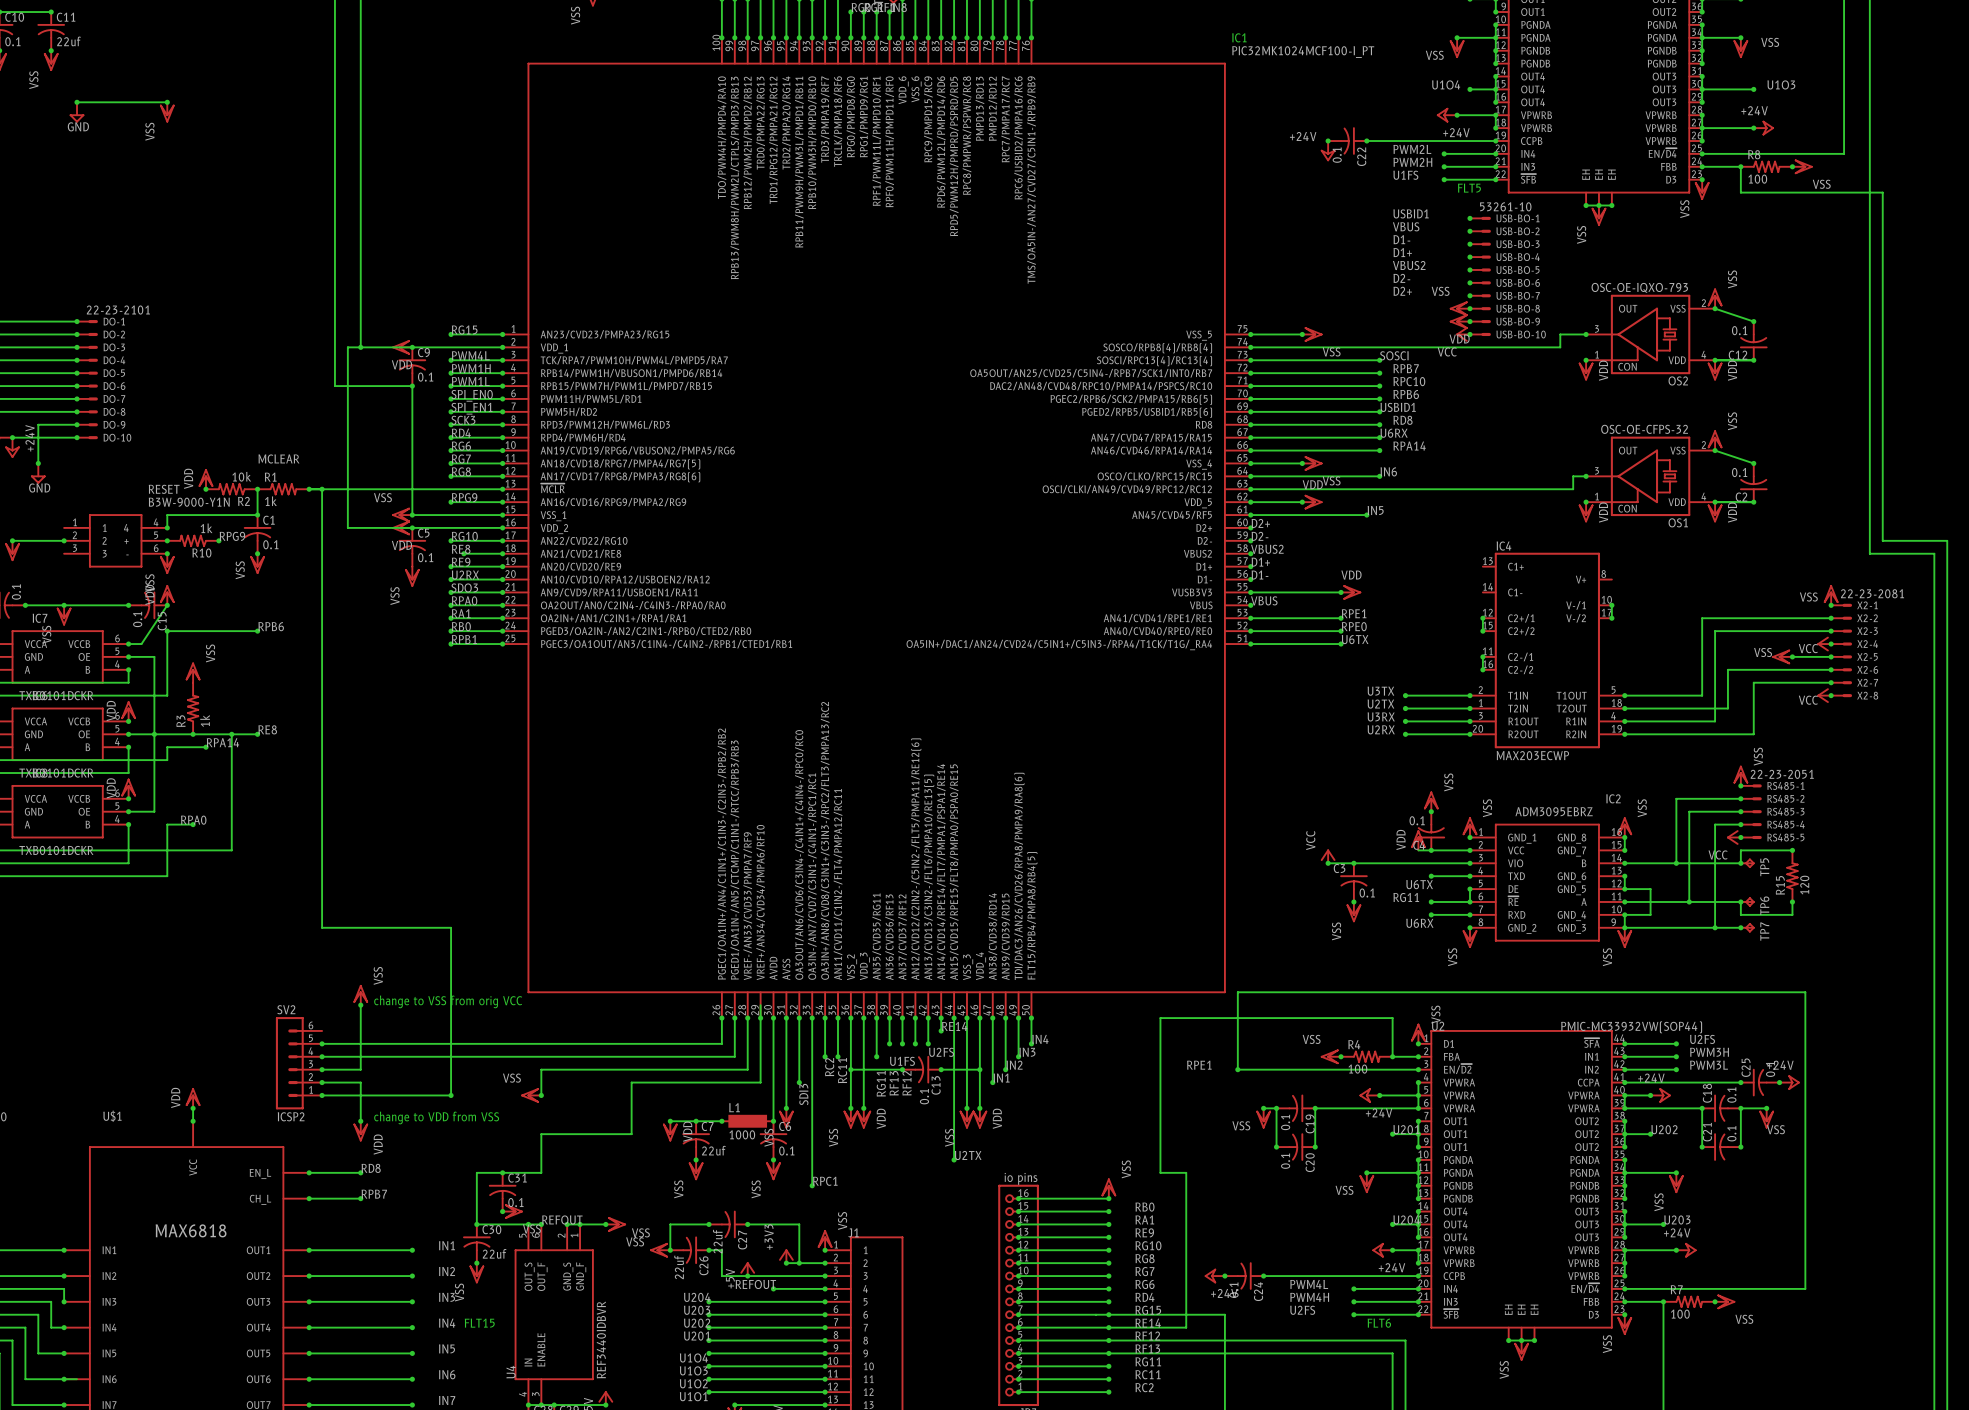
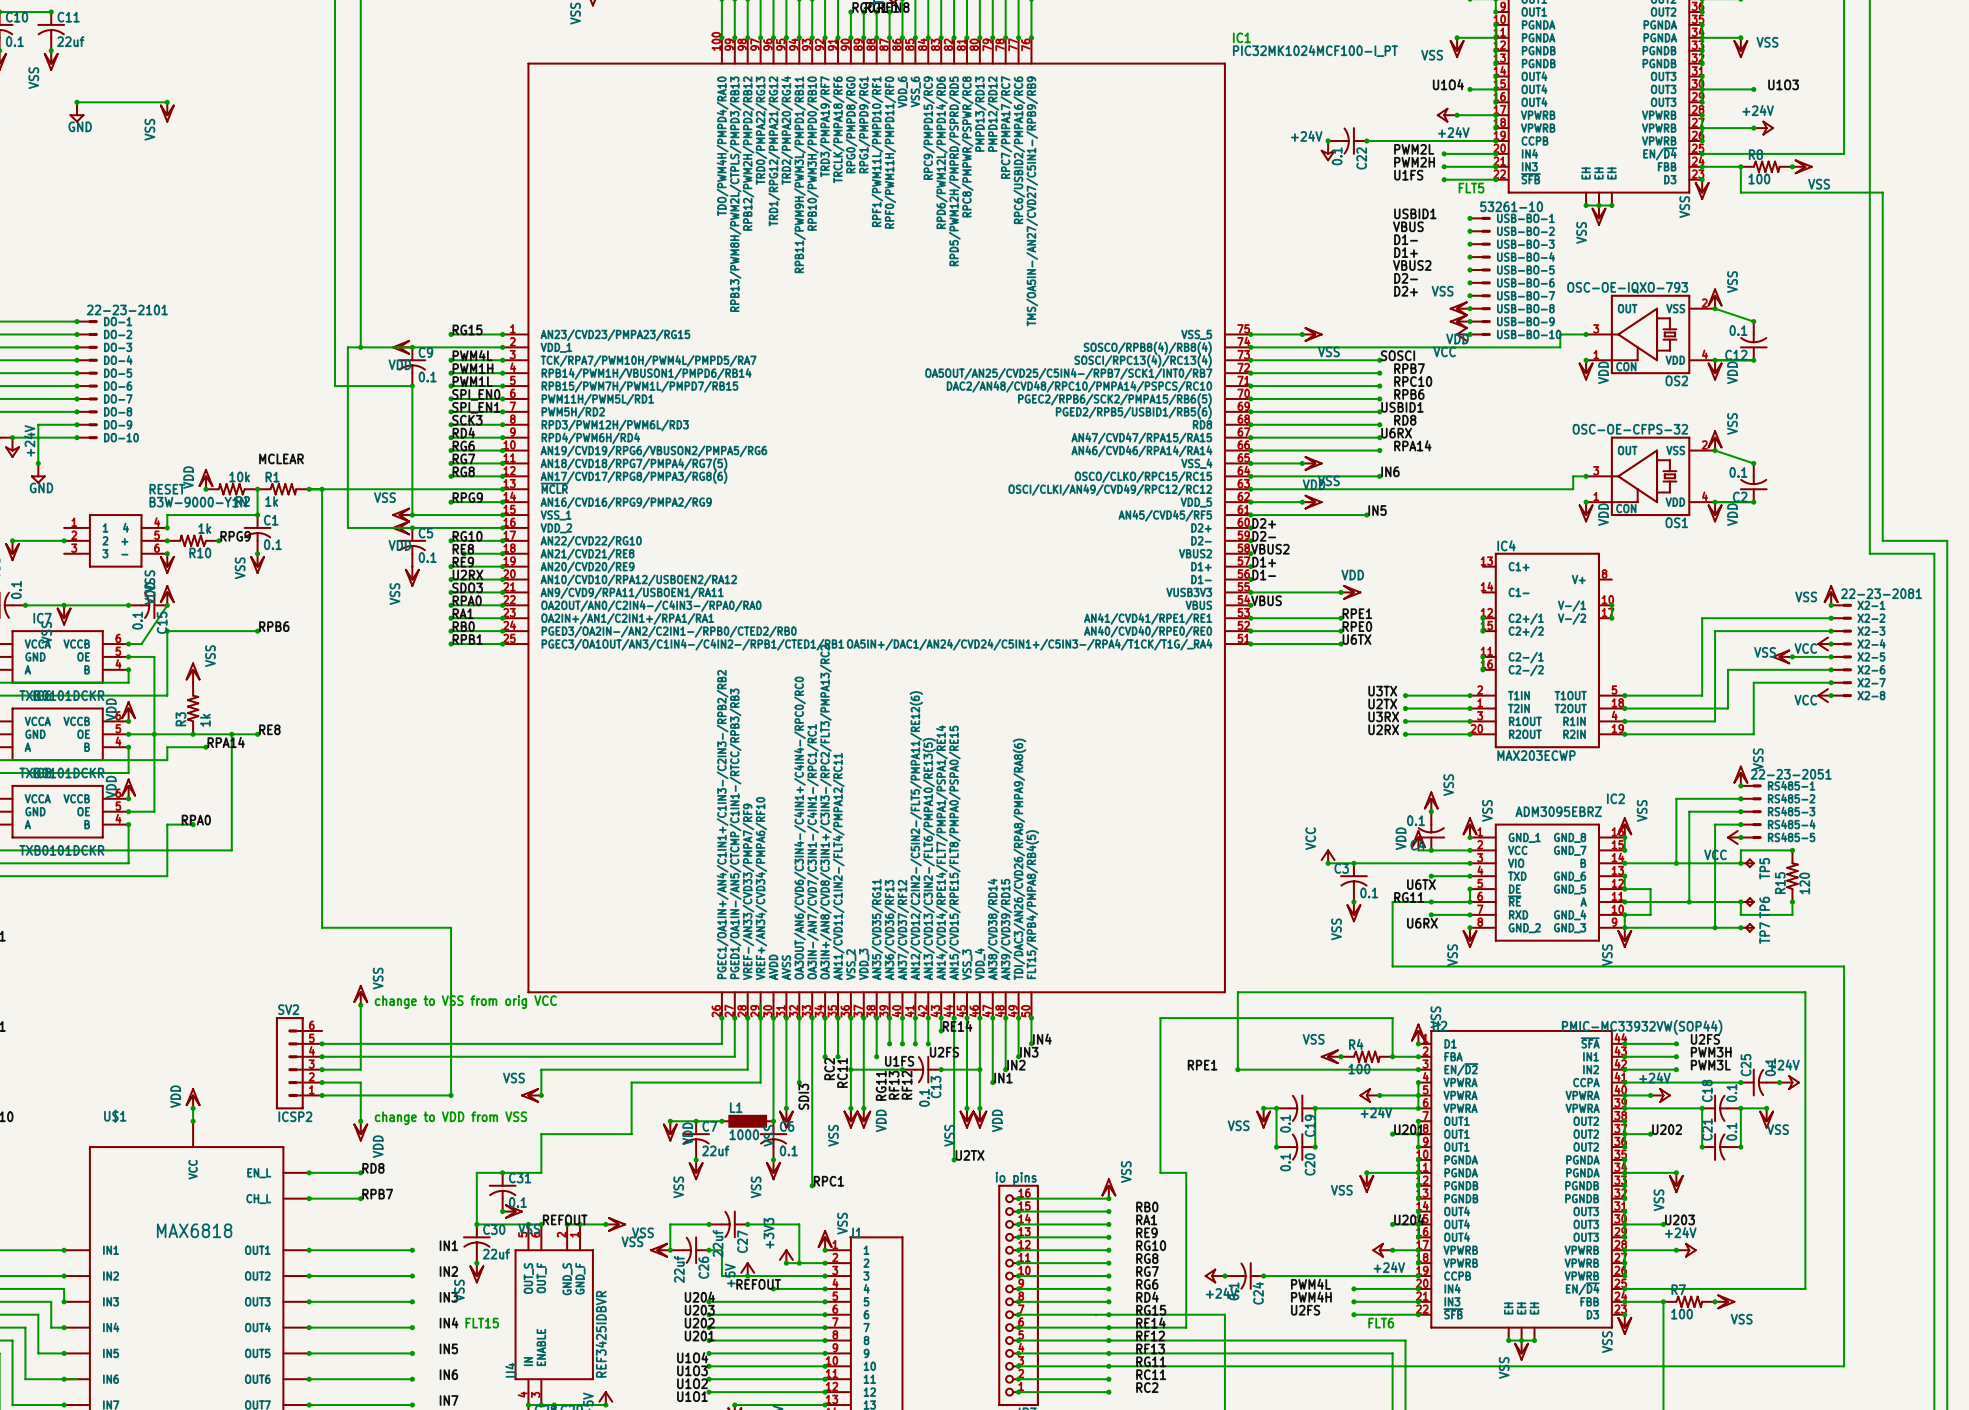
wire: none -> (1431, 901) (1392, 901) (1392, 966) (1844, 966) (1844, 1366) (1108, 1366)
U4 value: REF3440IDBVR (601, 1339) -> REF3425IDBVR (601, 1334)

